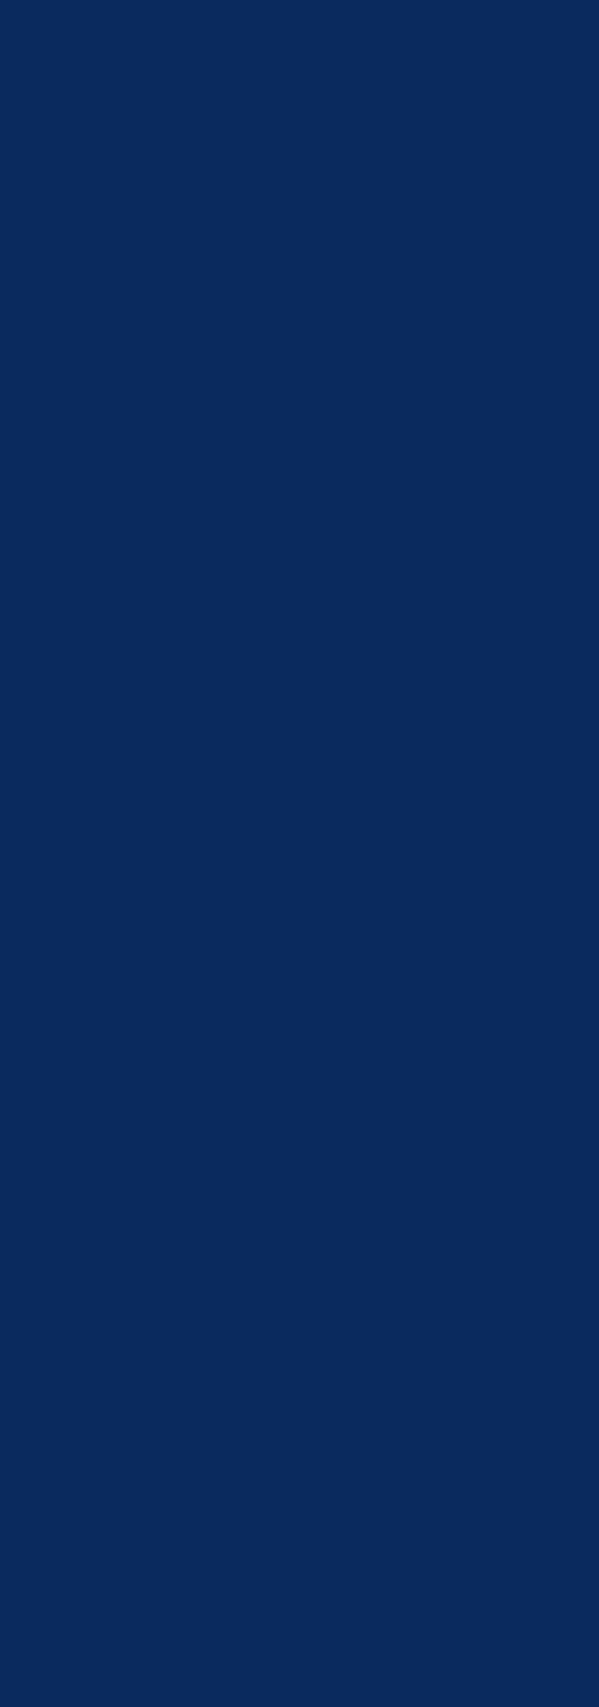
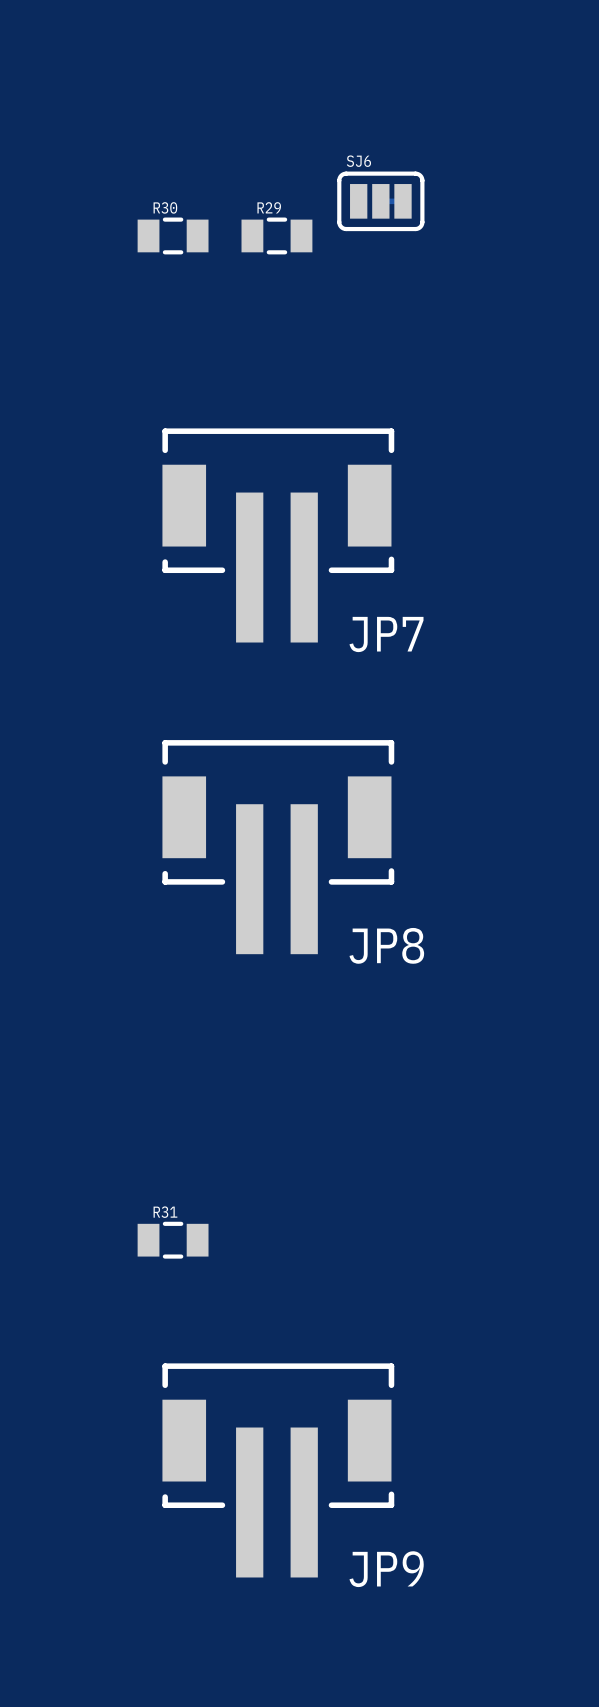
SJ6: none -> (380, 201)
R30: none -> (173, 235)
R29: none -> (276, 235)
JP7: none -> (278, 535)
JP8: none -> (278, 847)
R31: none -> (173, 1240)
JP9: none -> (278, 1470)

